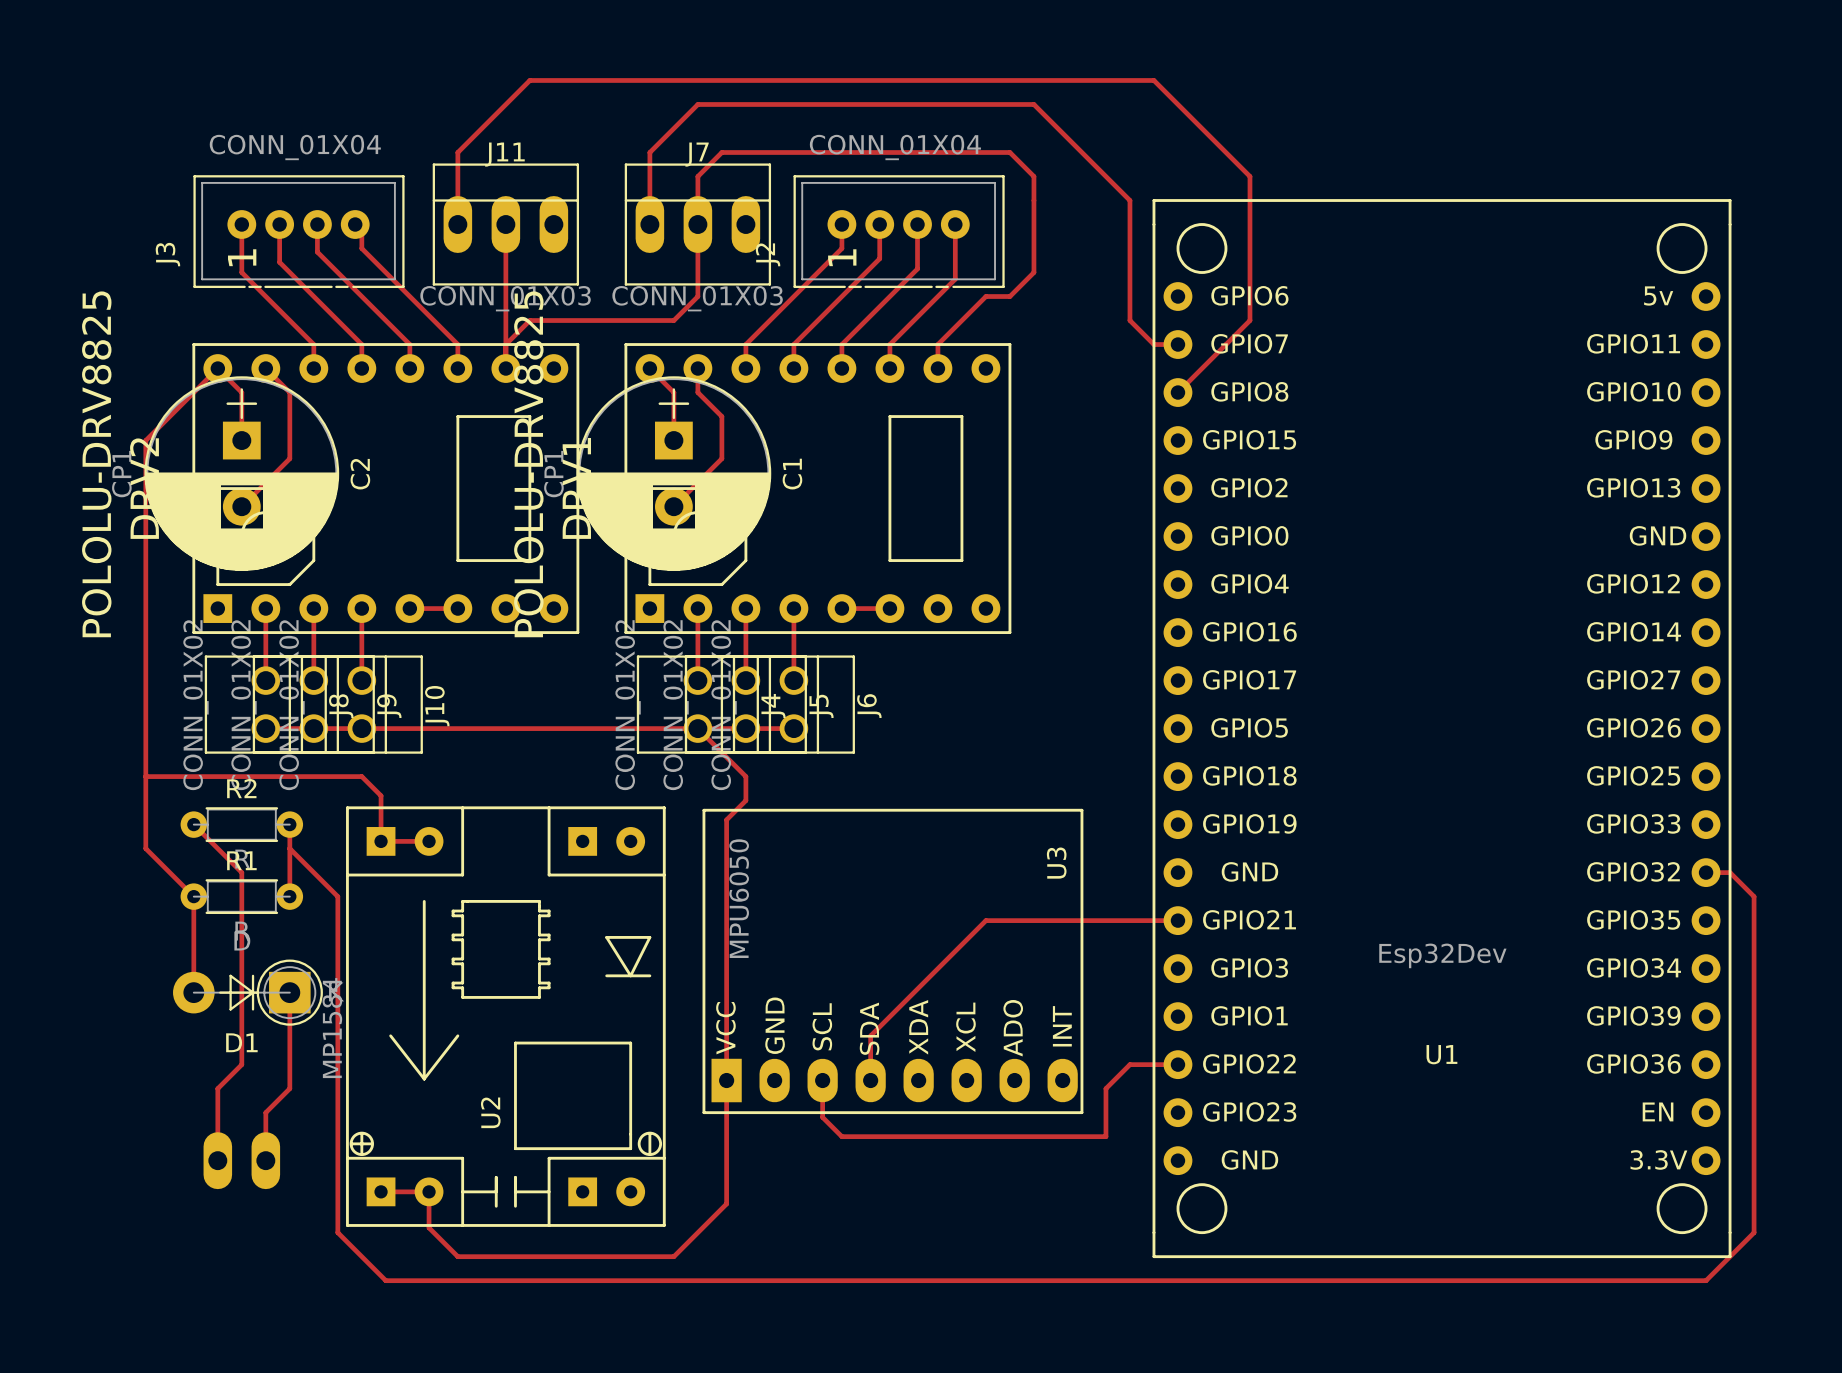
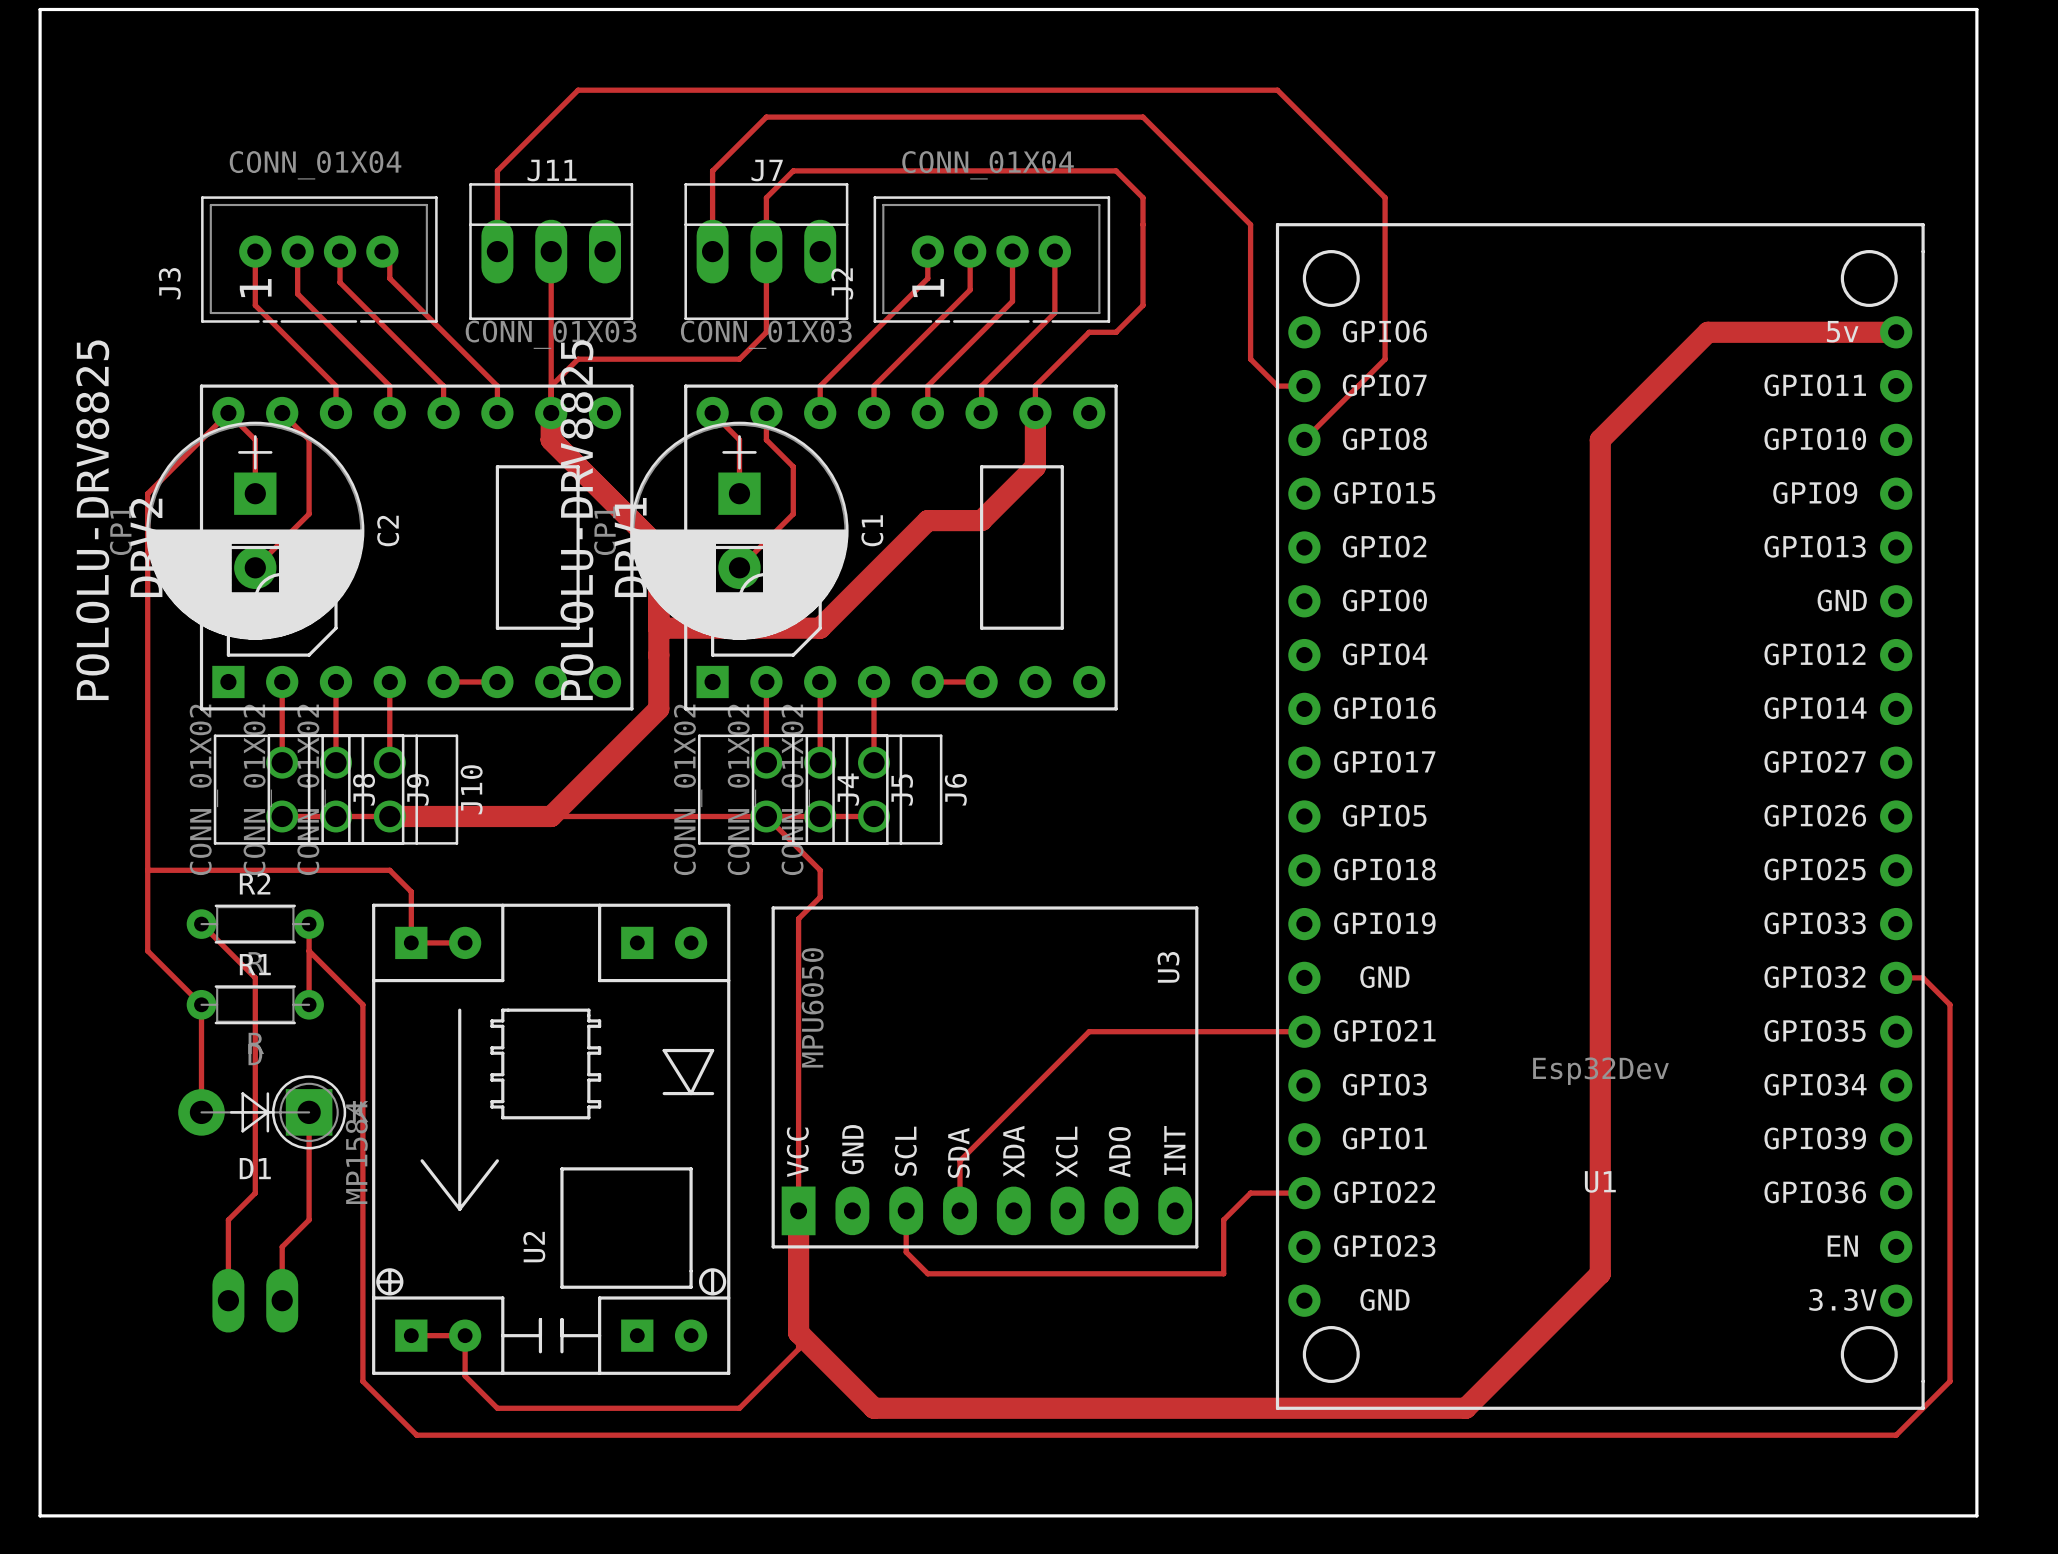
board edge: none -> (40, 9) (40, 1515) (1976, 1515) (1976, 9) (40, 9)
track: none -> (1896, 332) (1707, 332) (1600, 439) (1600, 1273) (1465, 1408) (874, 1408) (798, 1332) (798, 1210)
track: none -> (551, 412) (551, 439) (658, 547) (658, 708) (551, 816) (389, 816)
track: none -> (1035, 412) (1035, 466) (981, 520) (927, 520) (820, 628) (658, 628)

